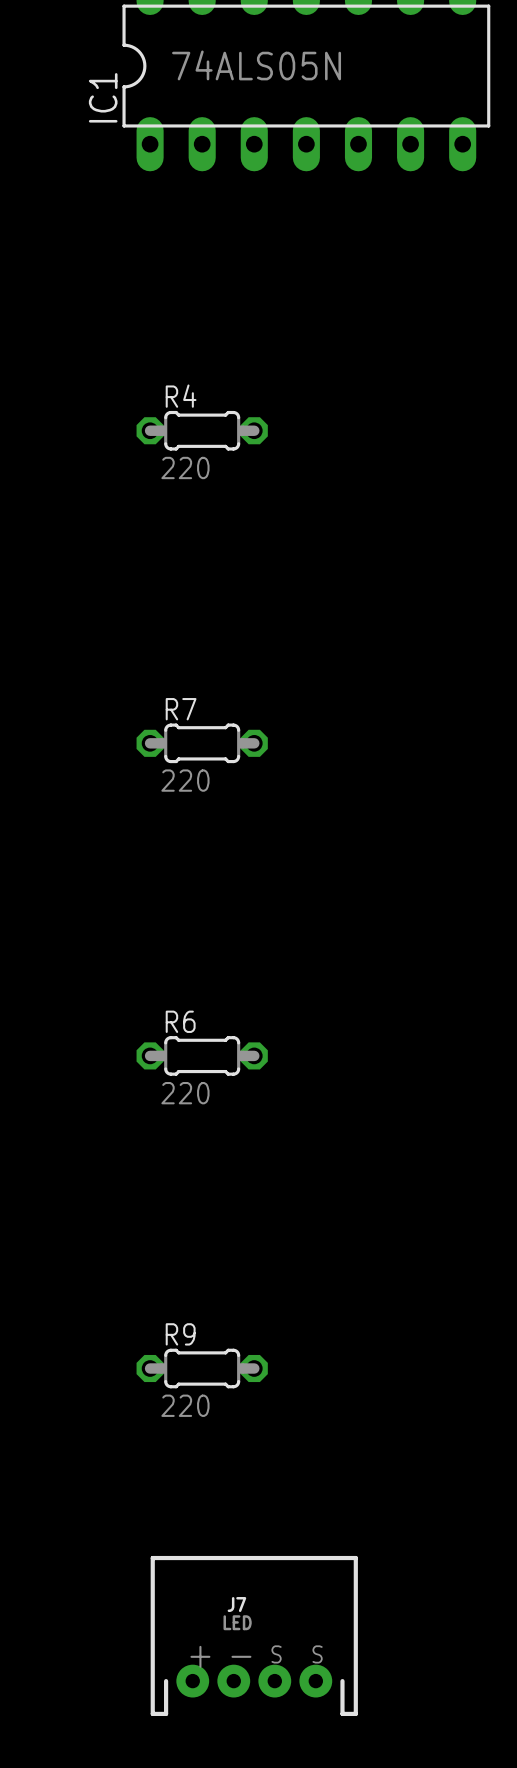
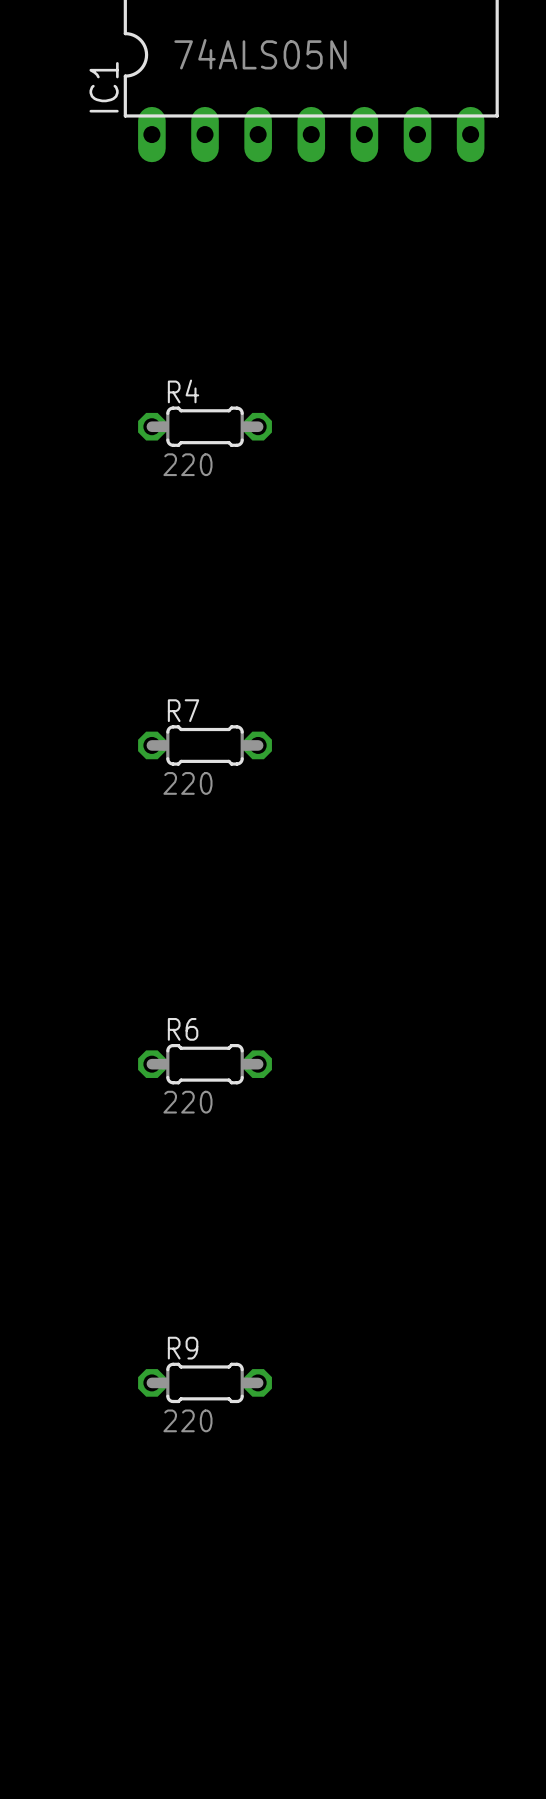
J7: LED (254, 1635) -> none

